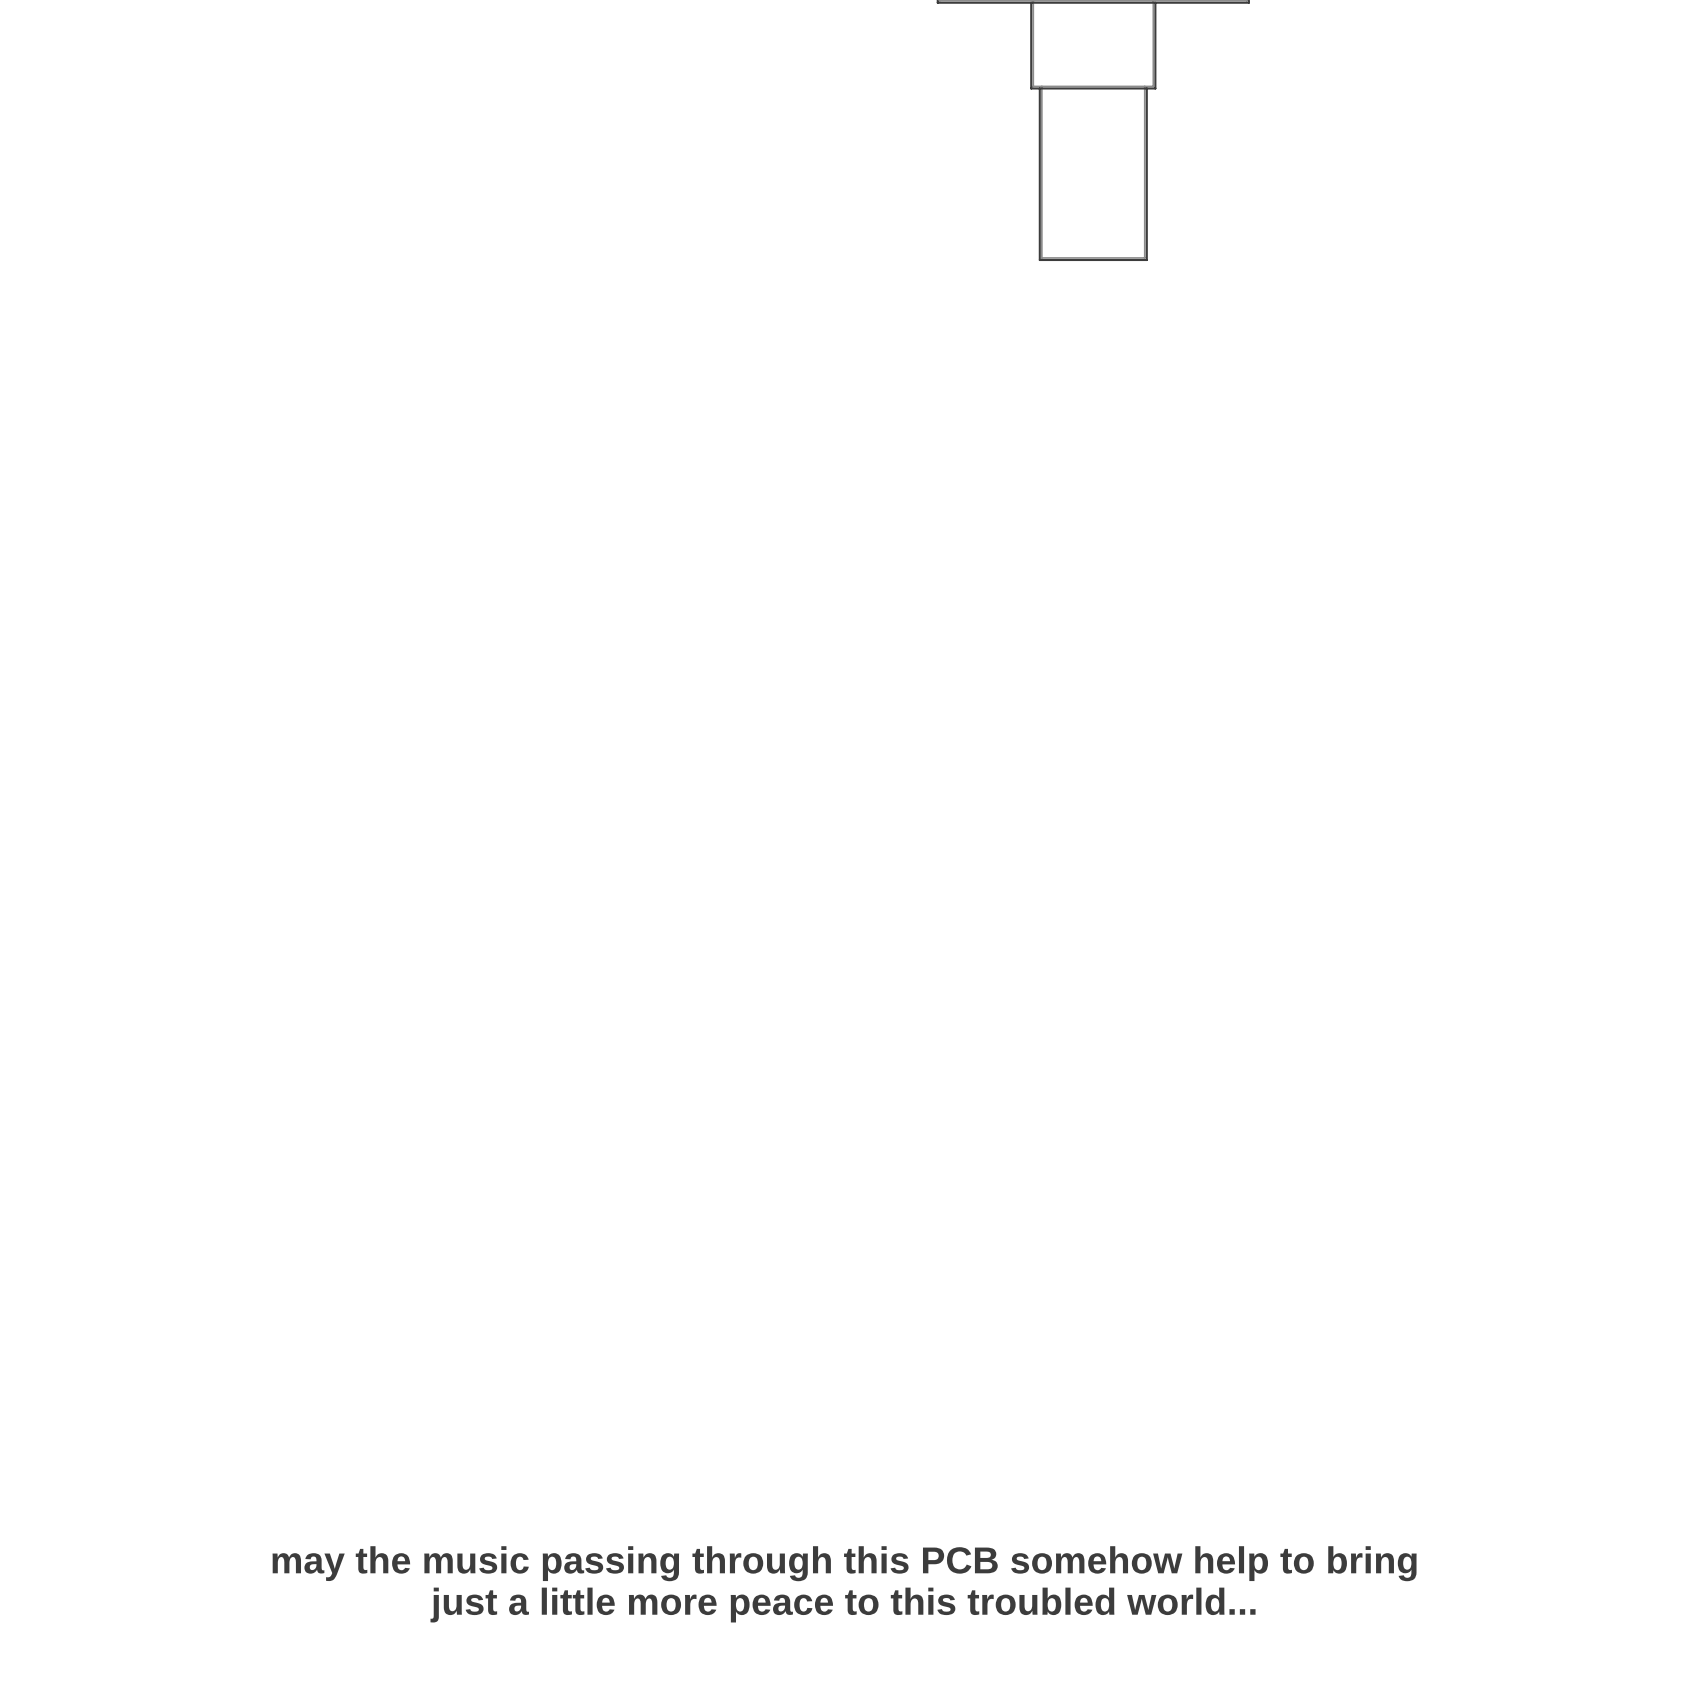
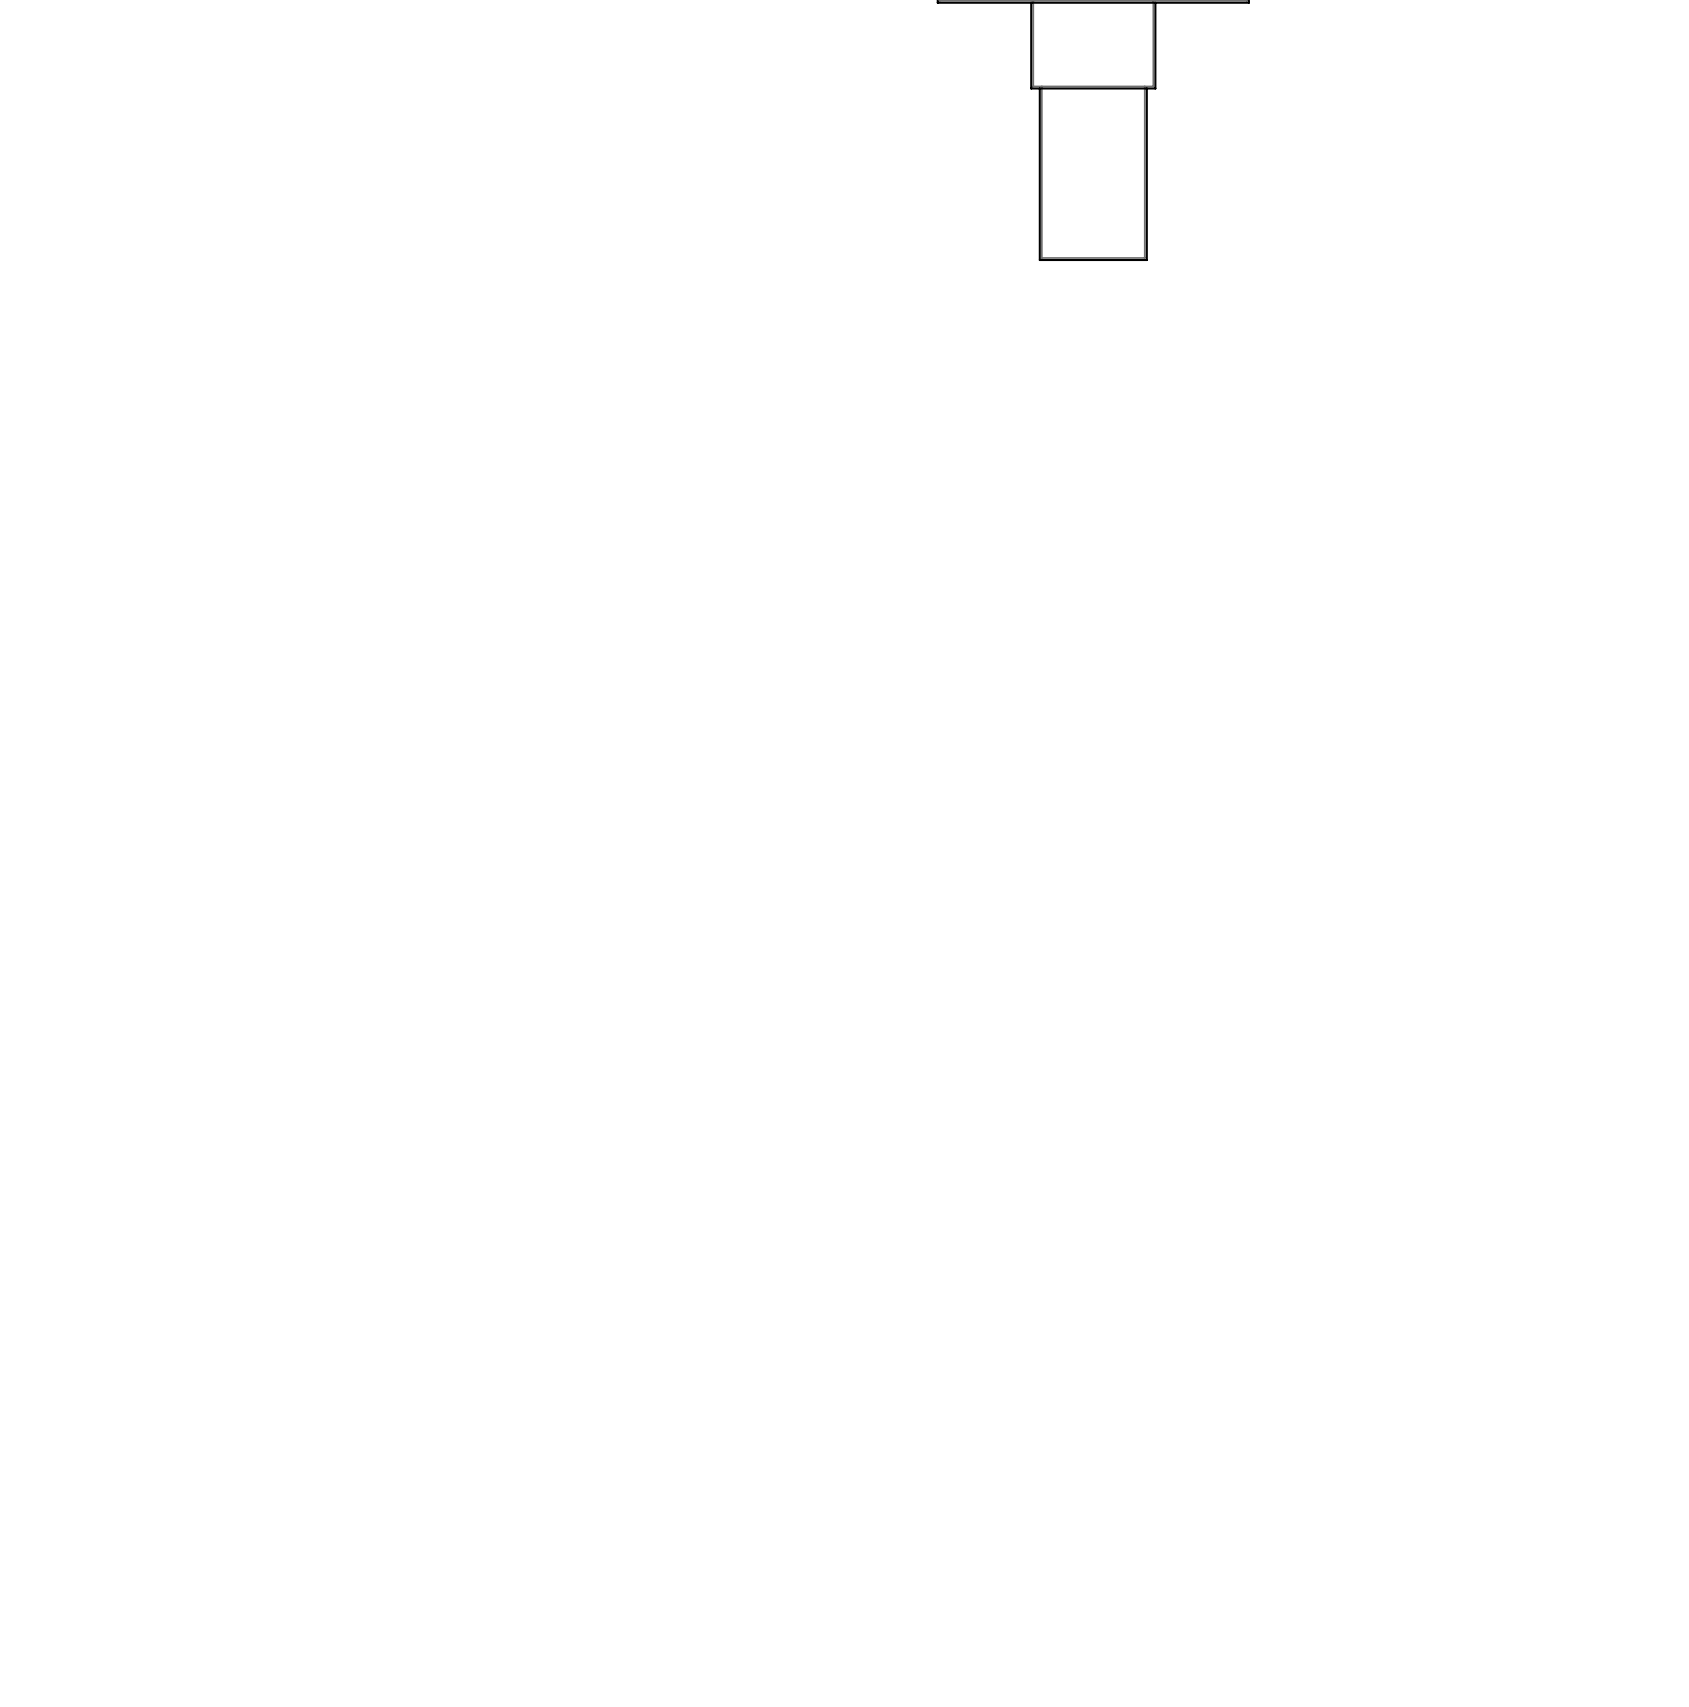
text: may the music passing through this PCB somehow help to bring (844, 1563) -> none
text: just a little more peace to this troubled world... (843, 1605) -> none

